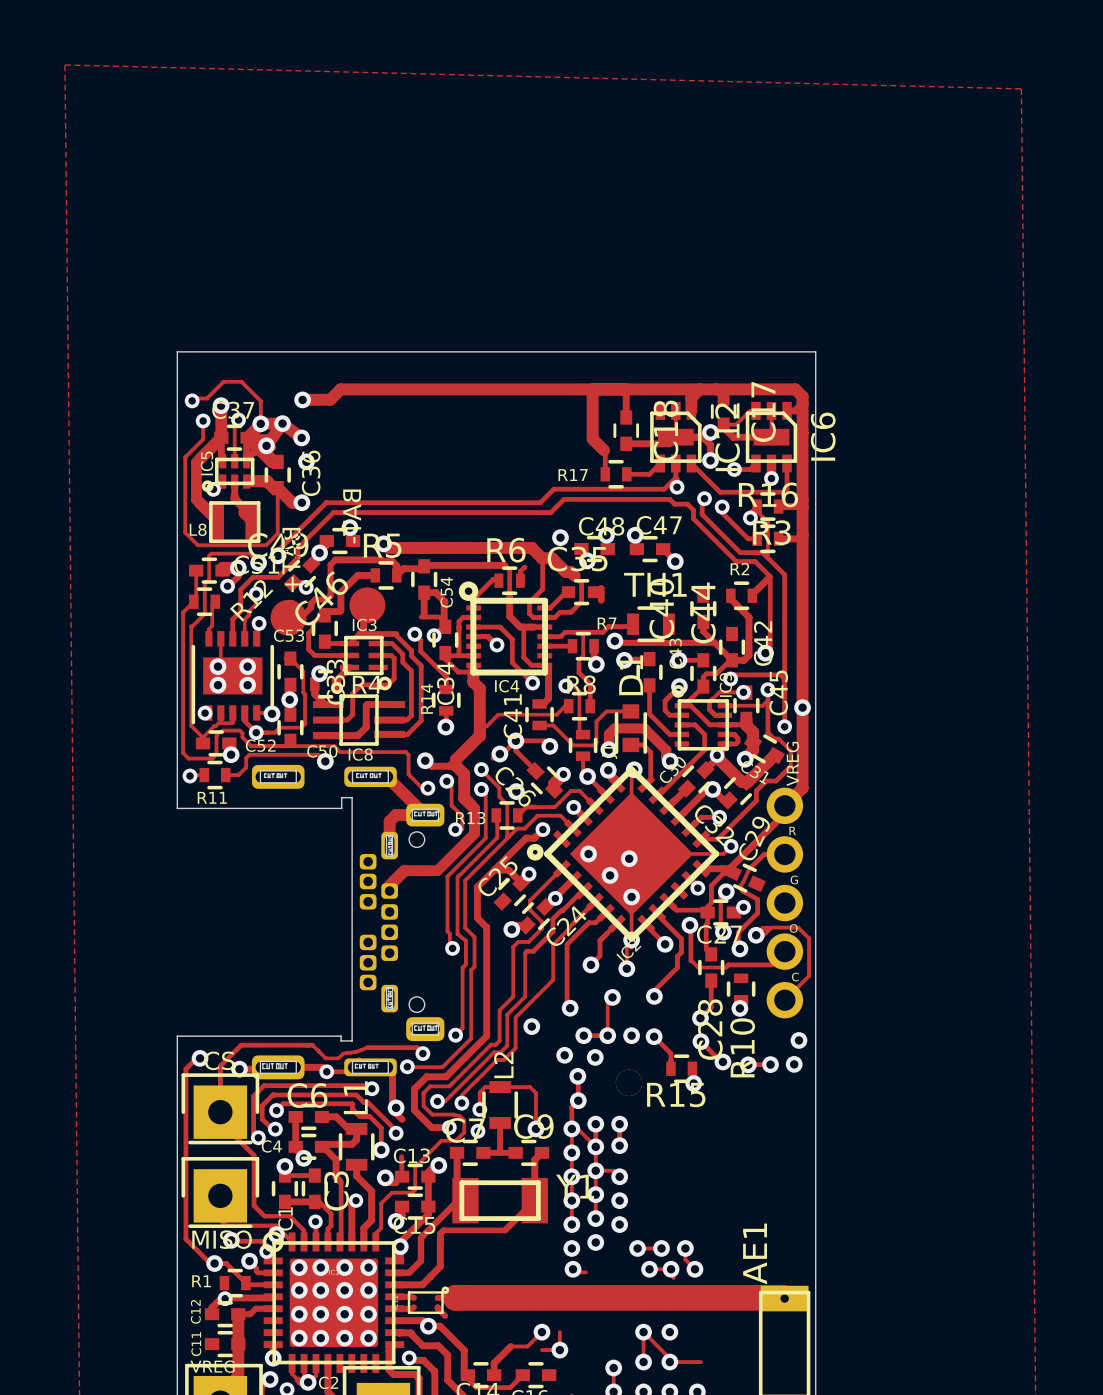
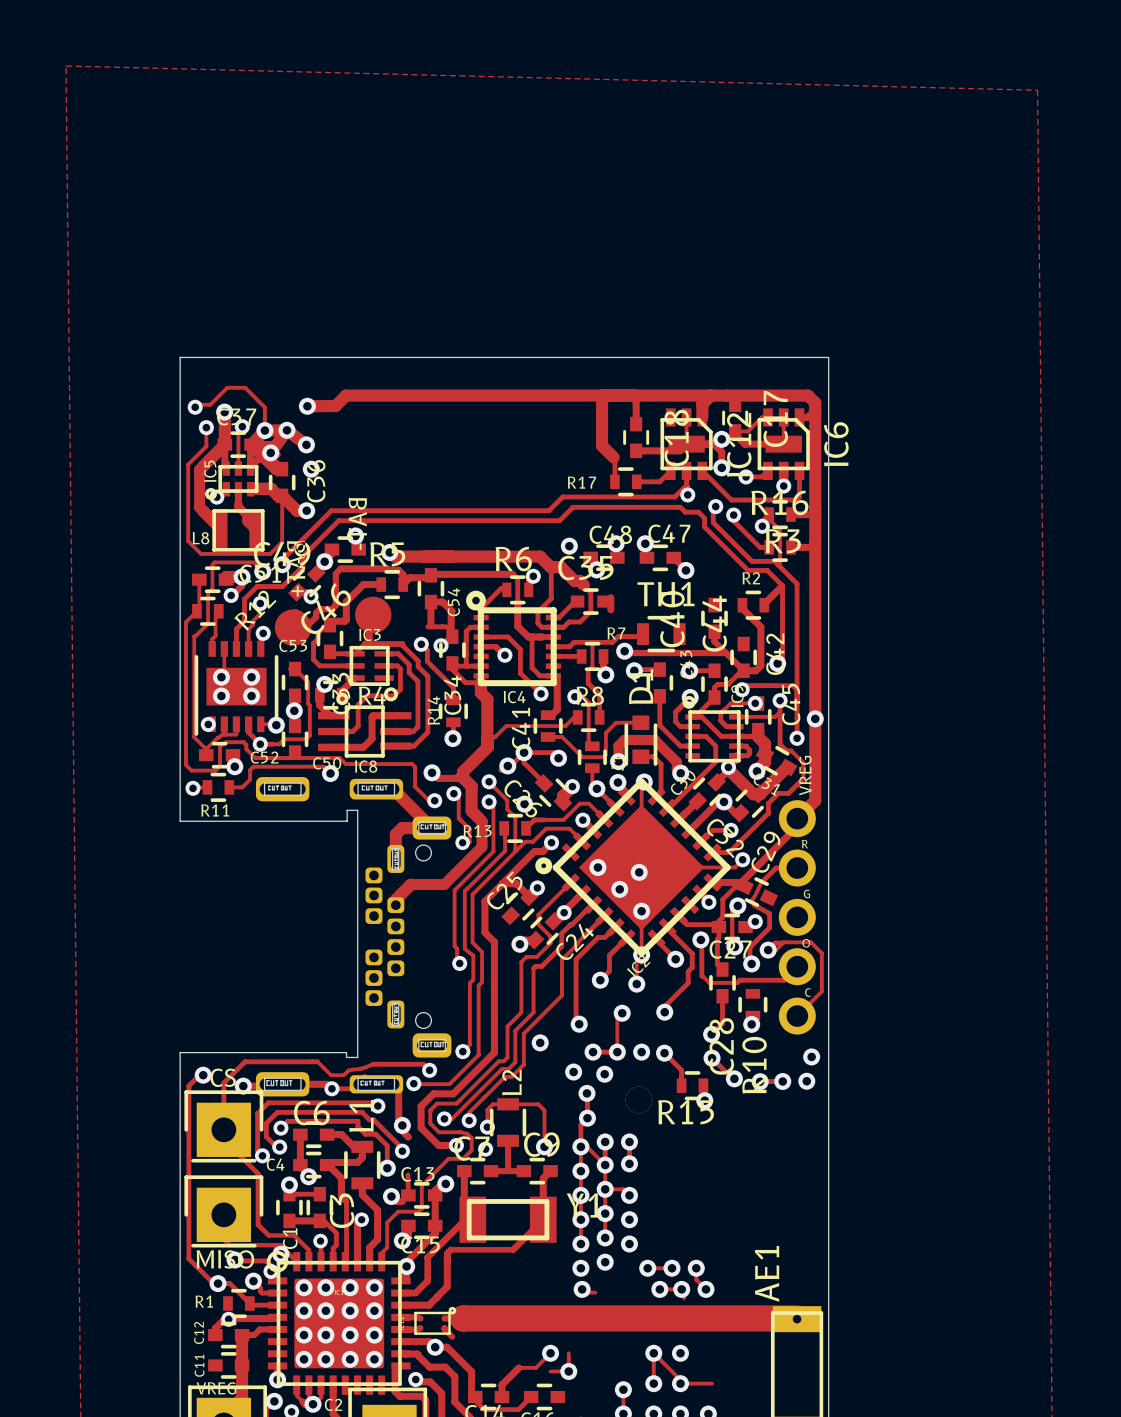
via: none -> (533, 576)

